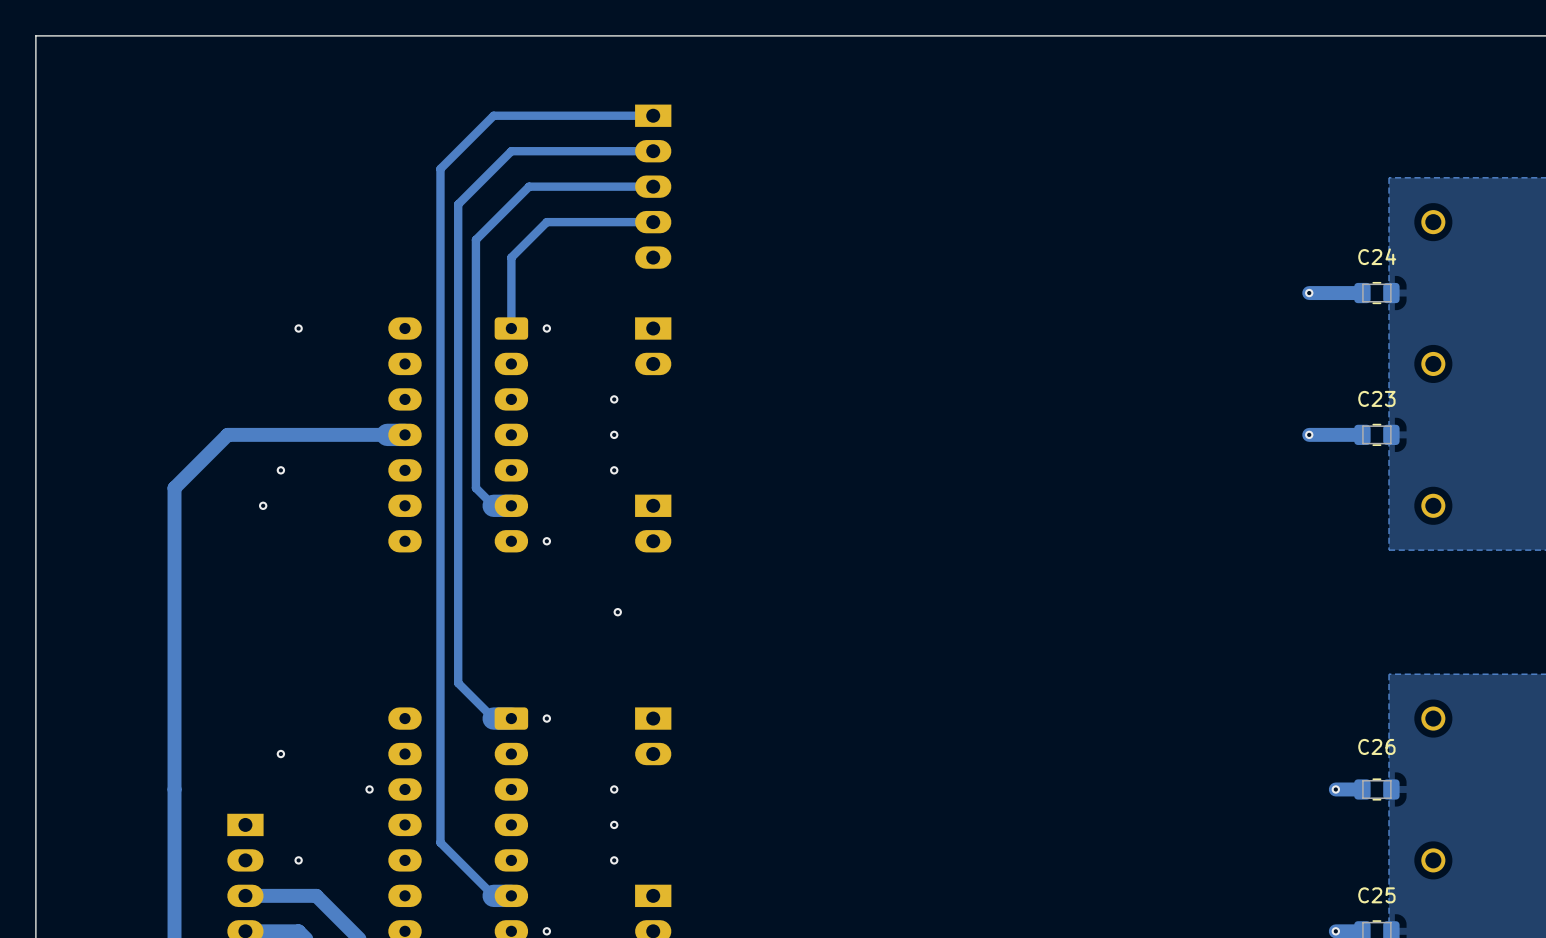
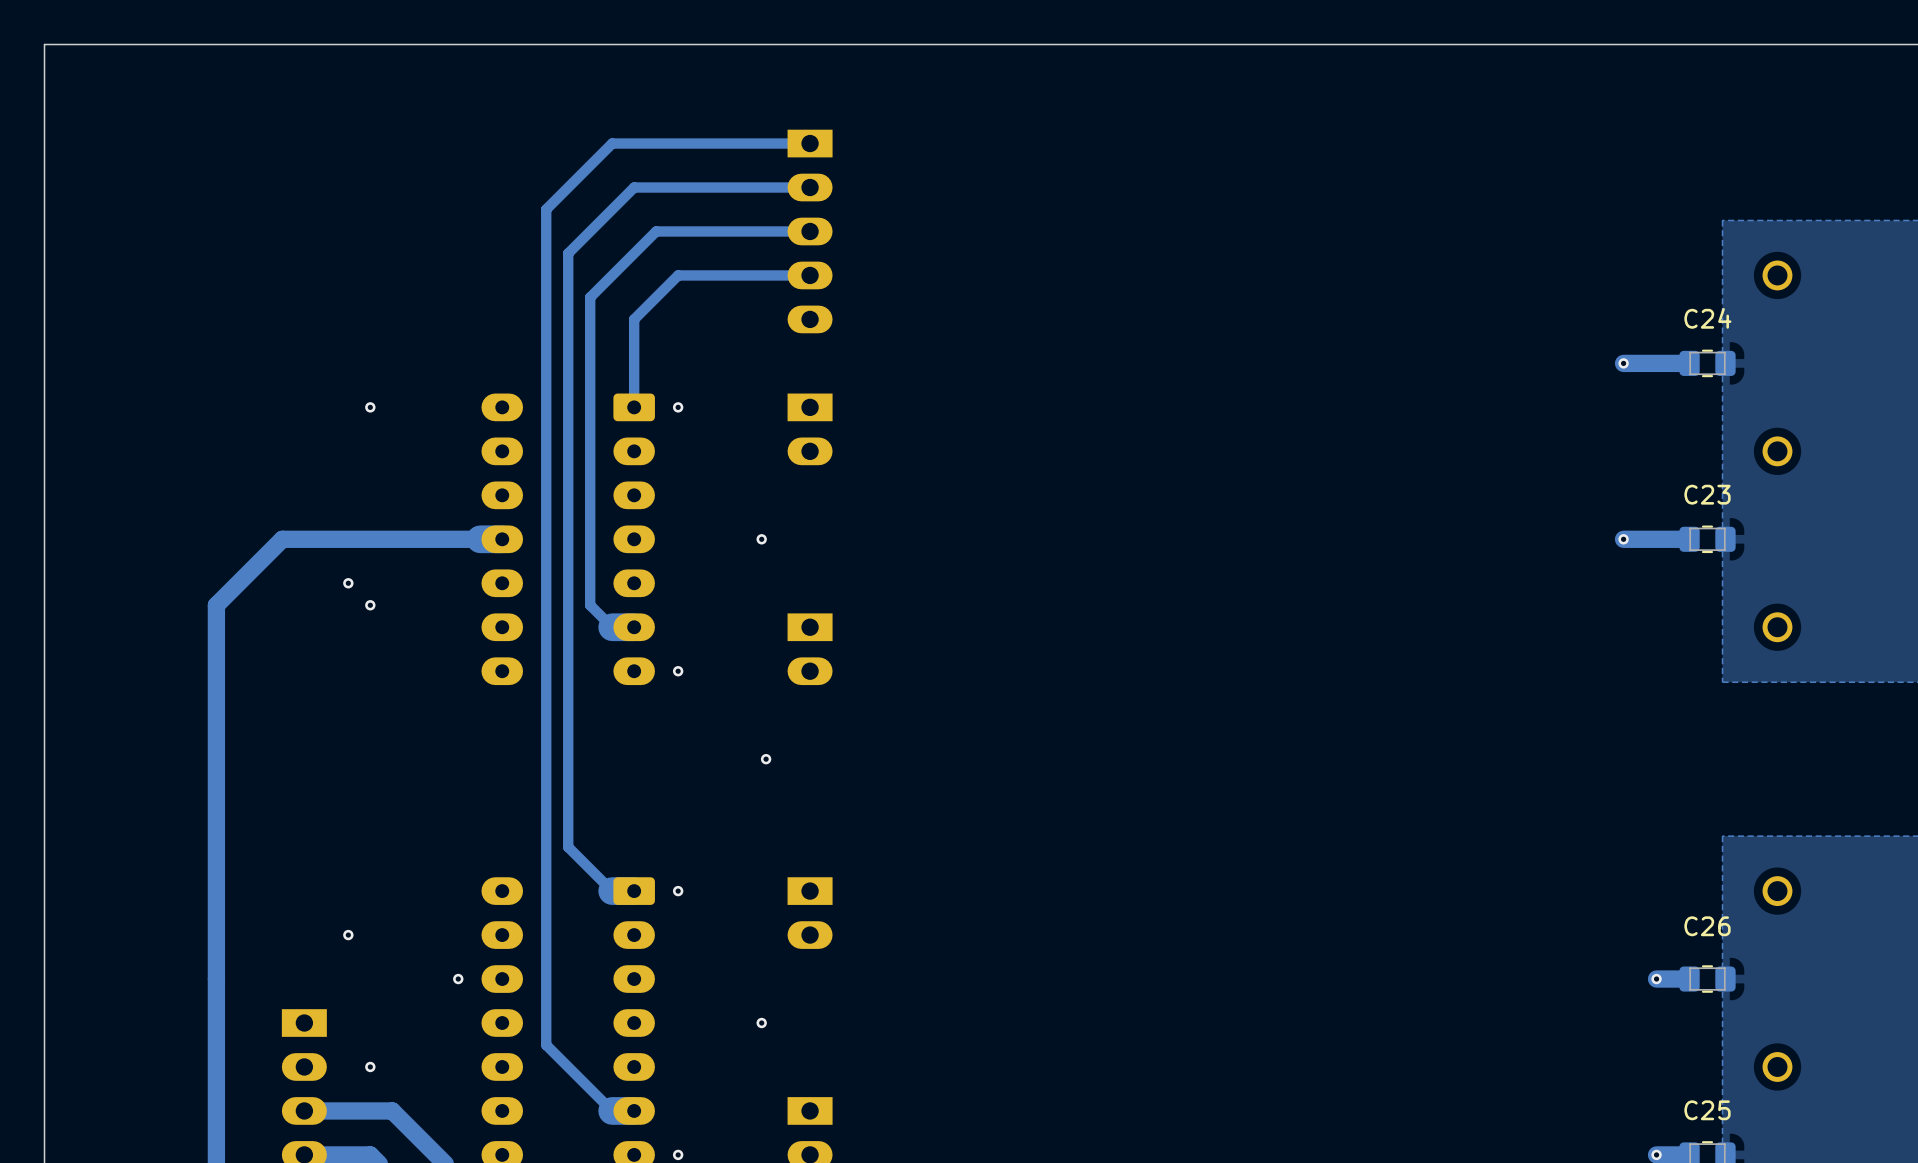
via: (614, 399) -> none
via: (614, 470) -> none
via position: (263, 505) -> (370, 605)
via: (614, 789) -> none
via: (614, 860) -> none

